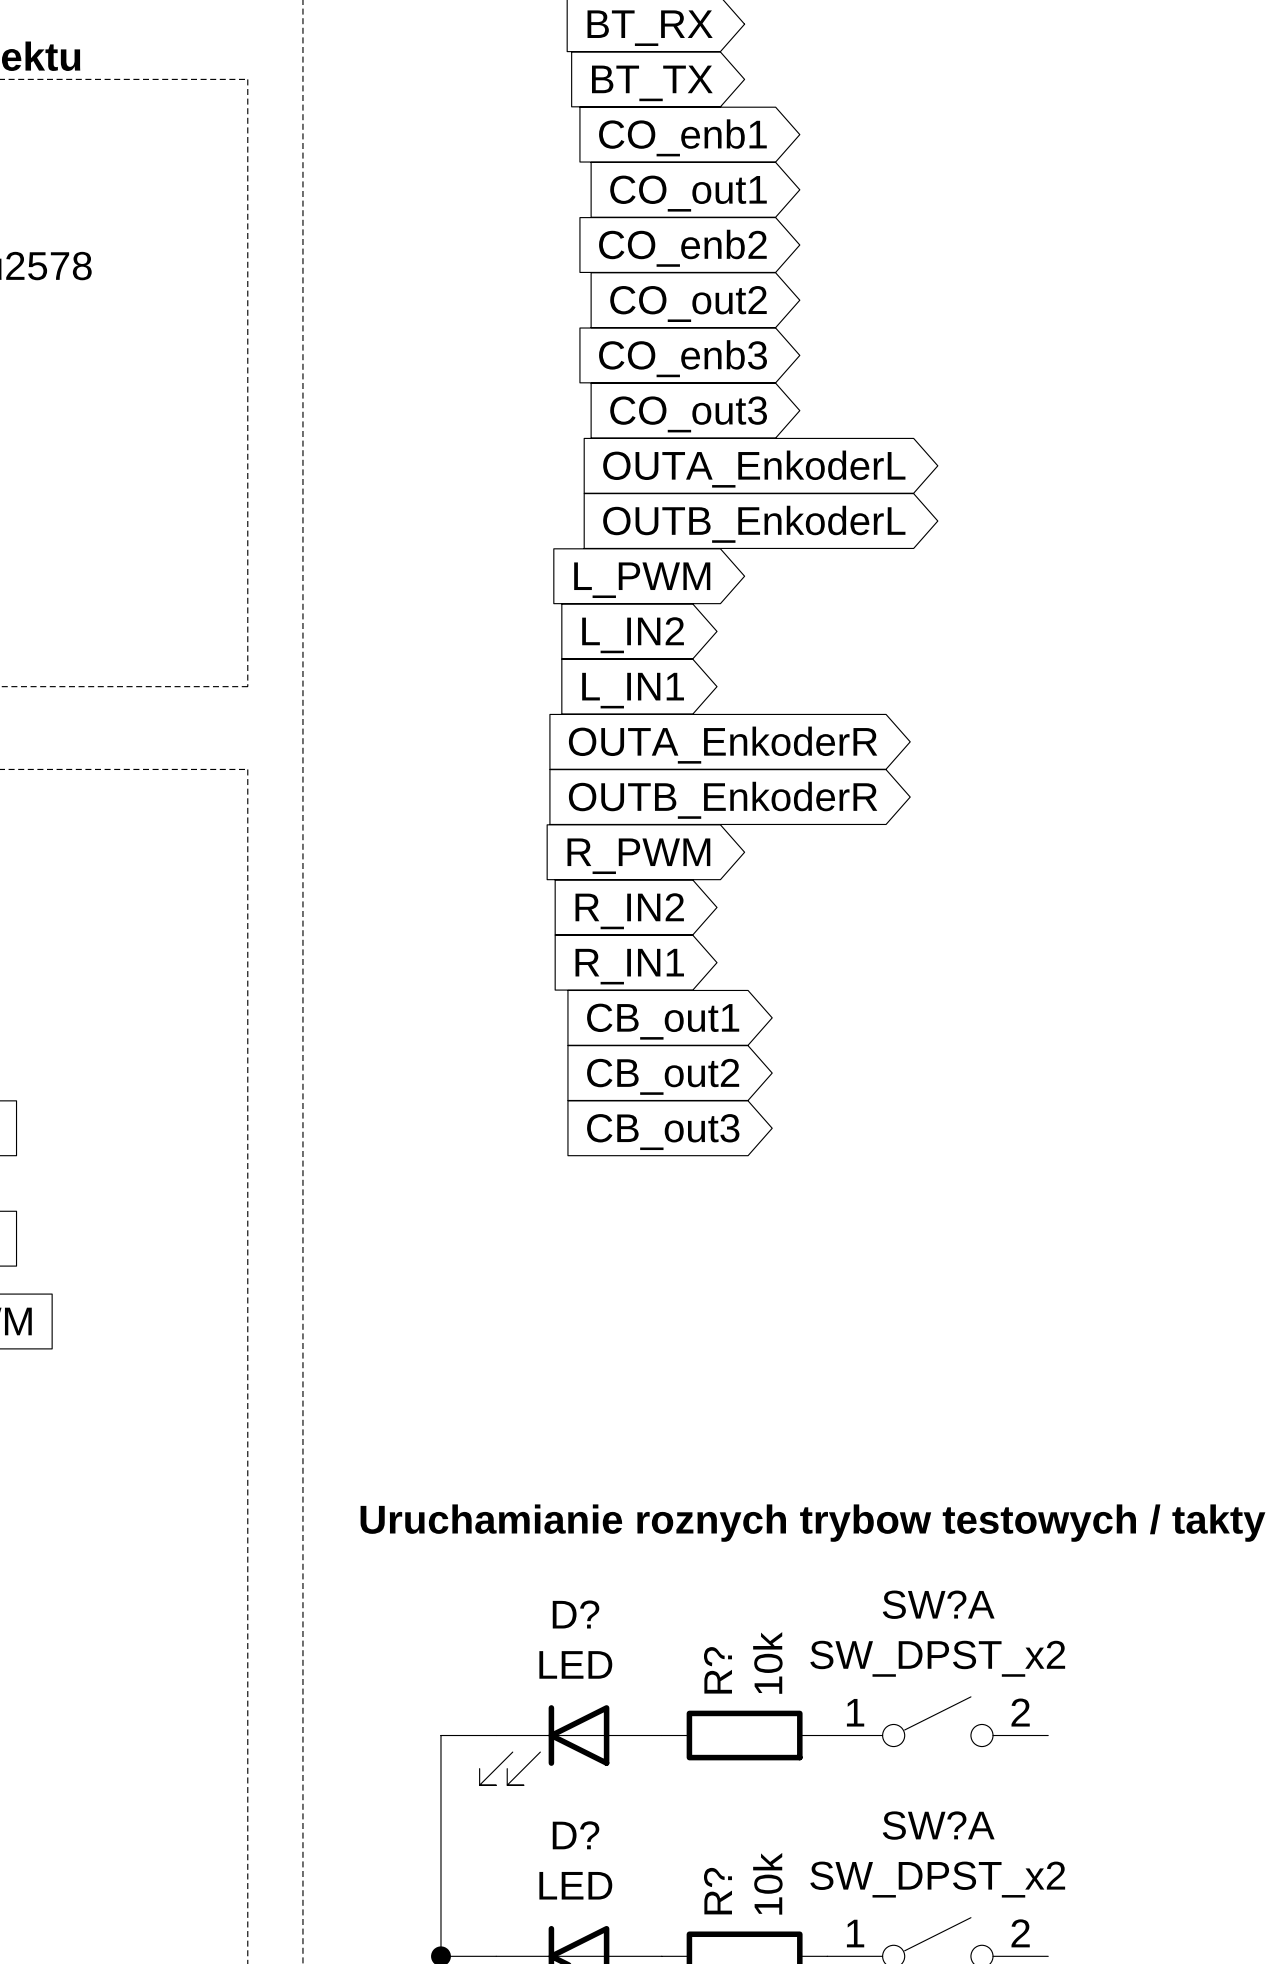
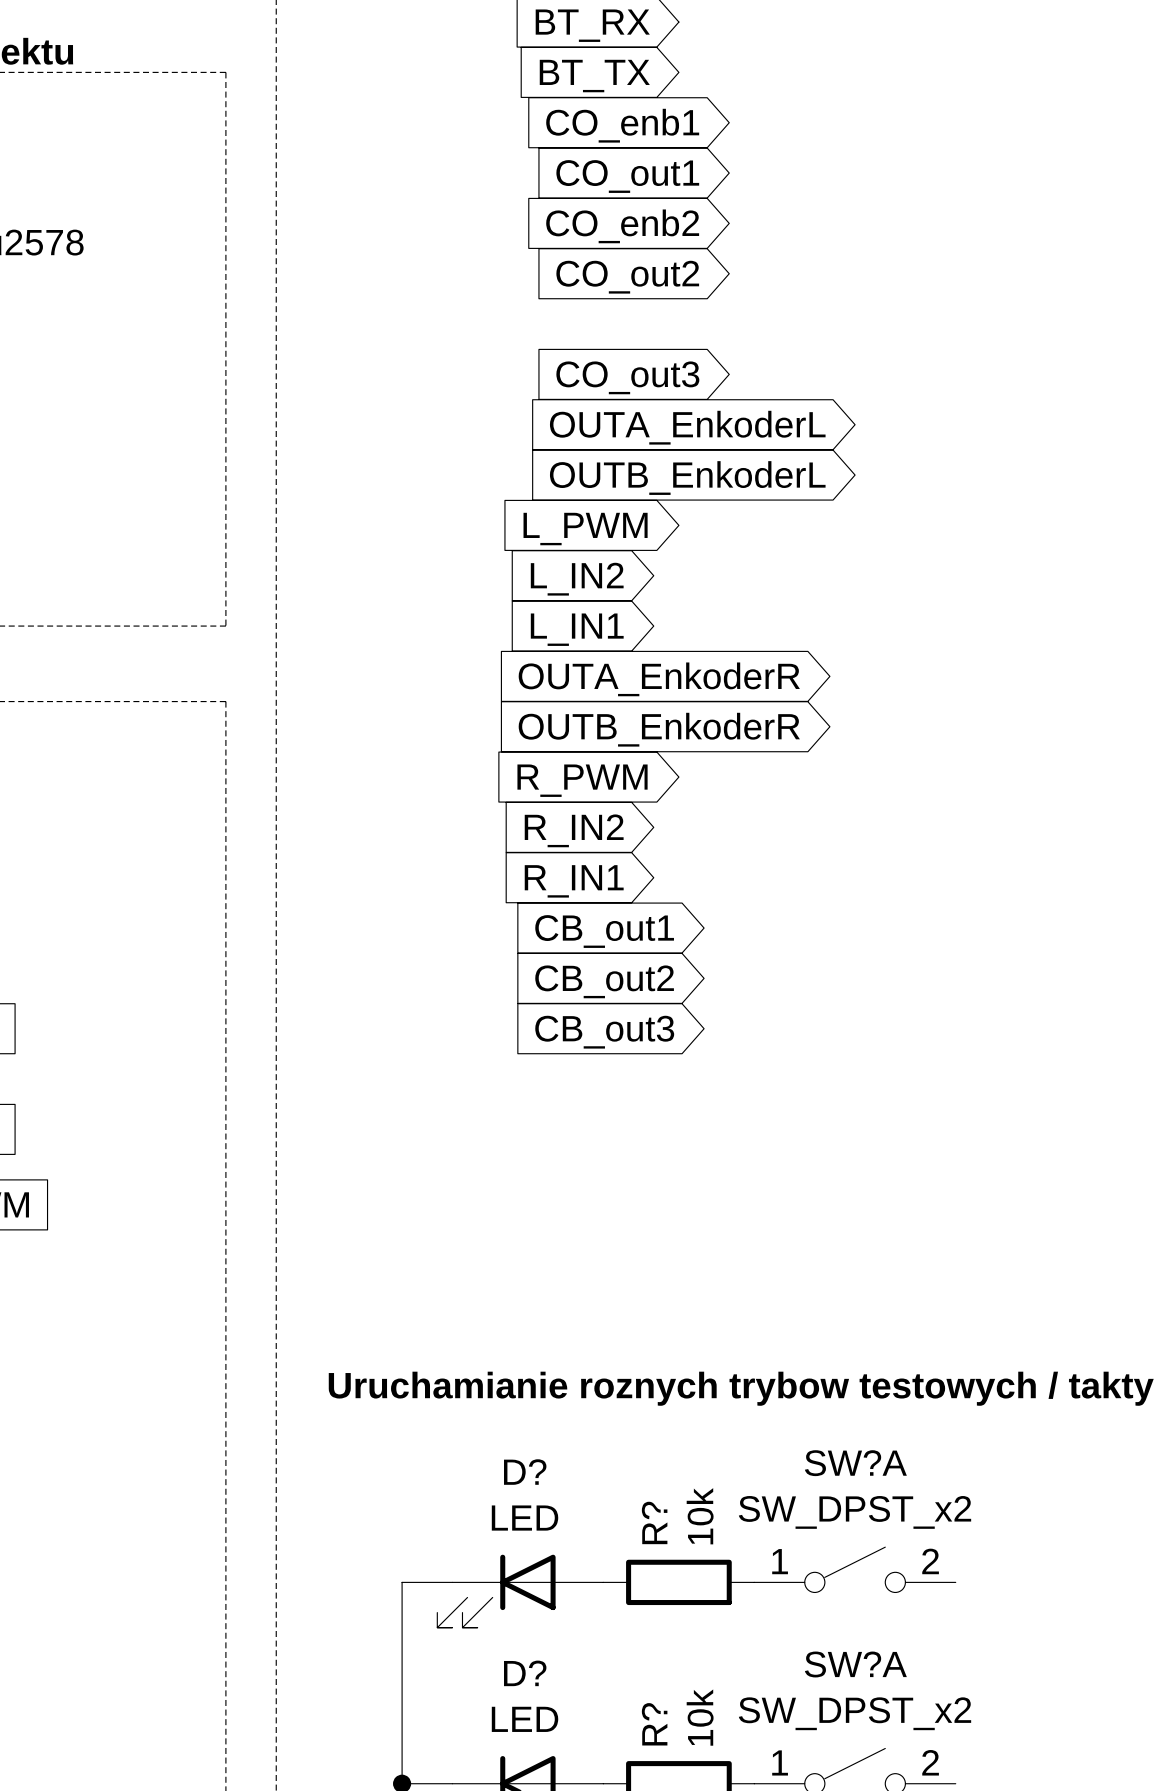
global label: CO_enb3 (683, 358) -> none

